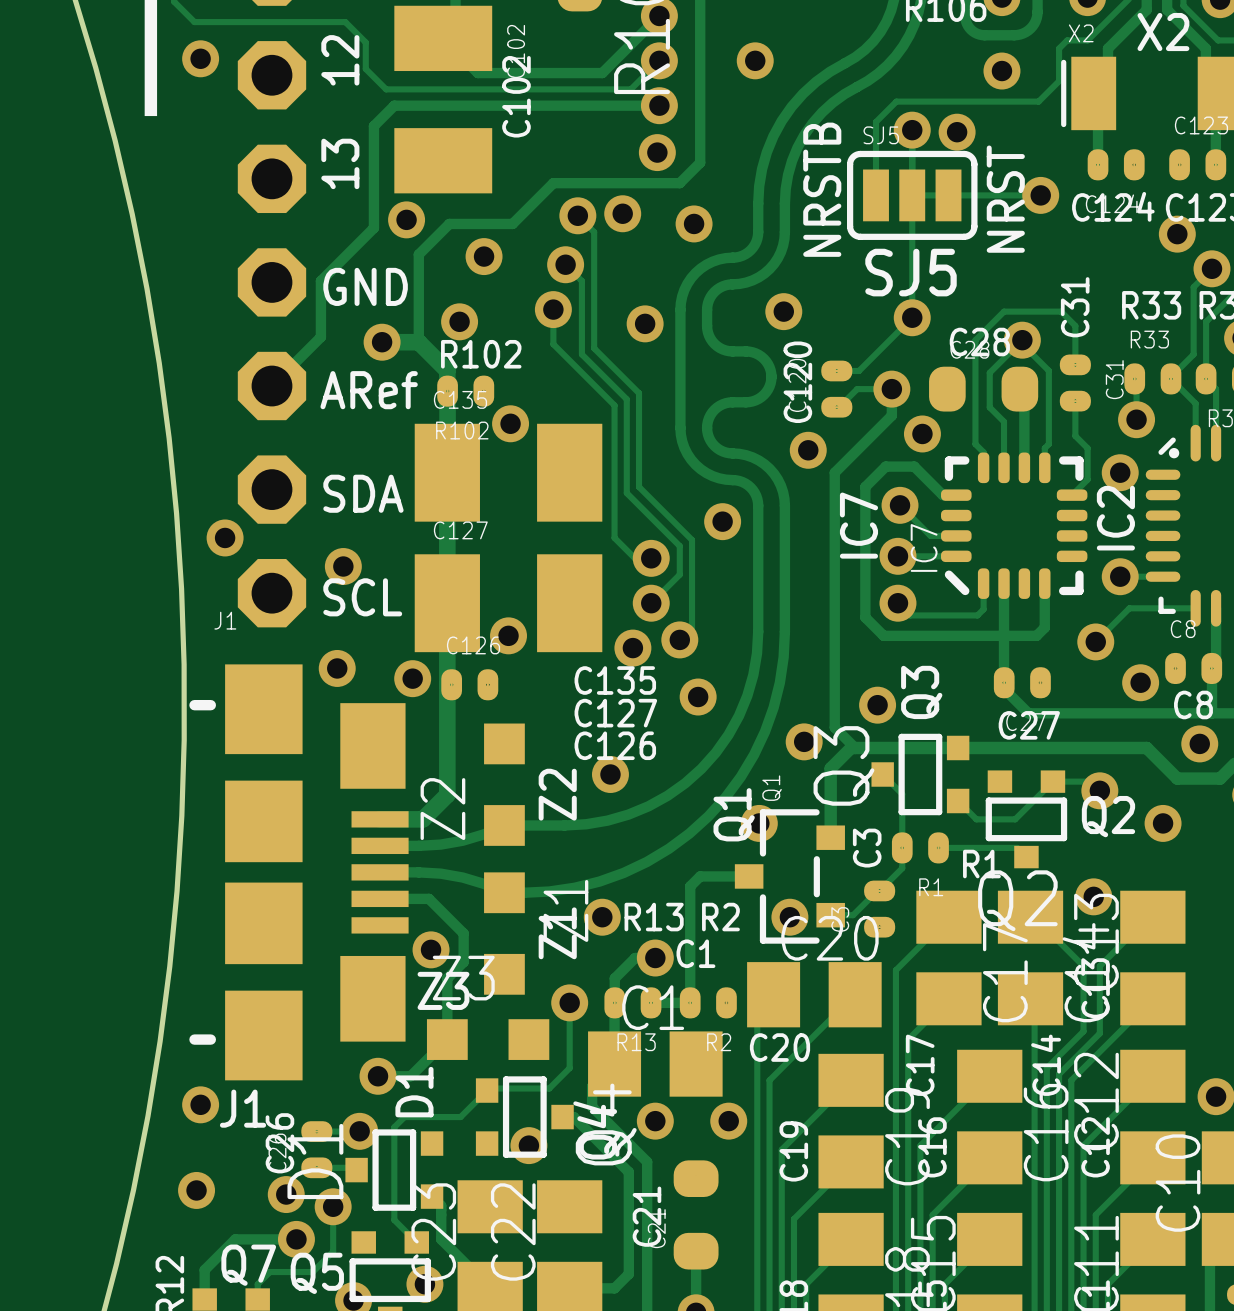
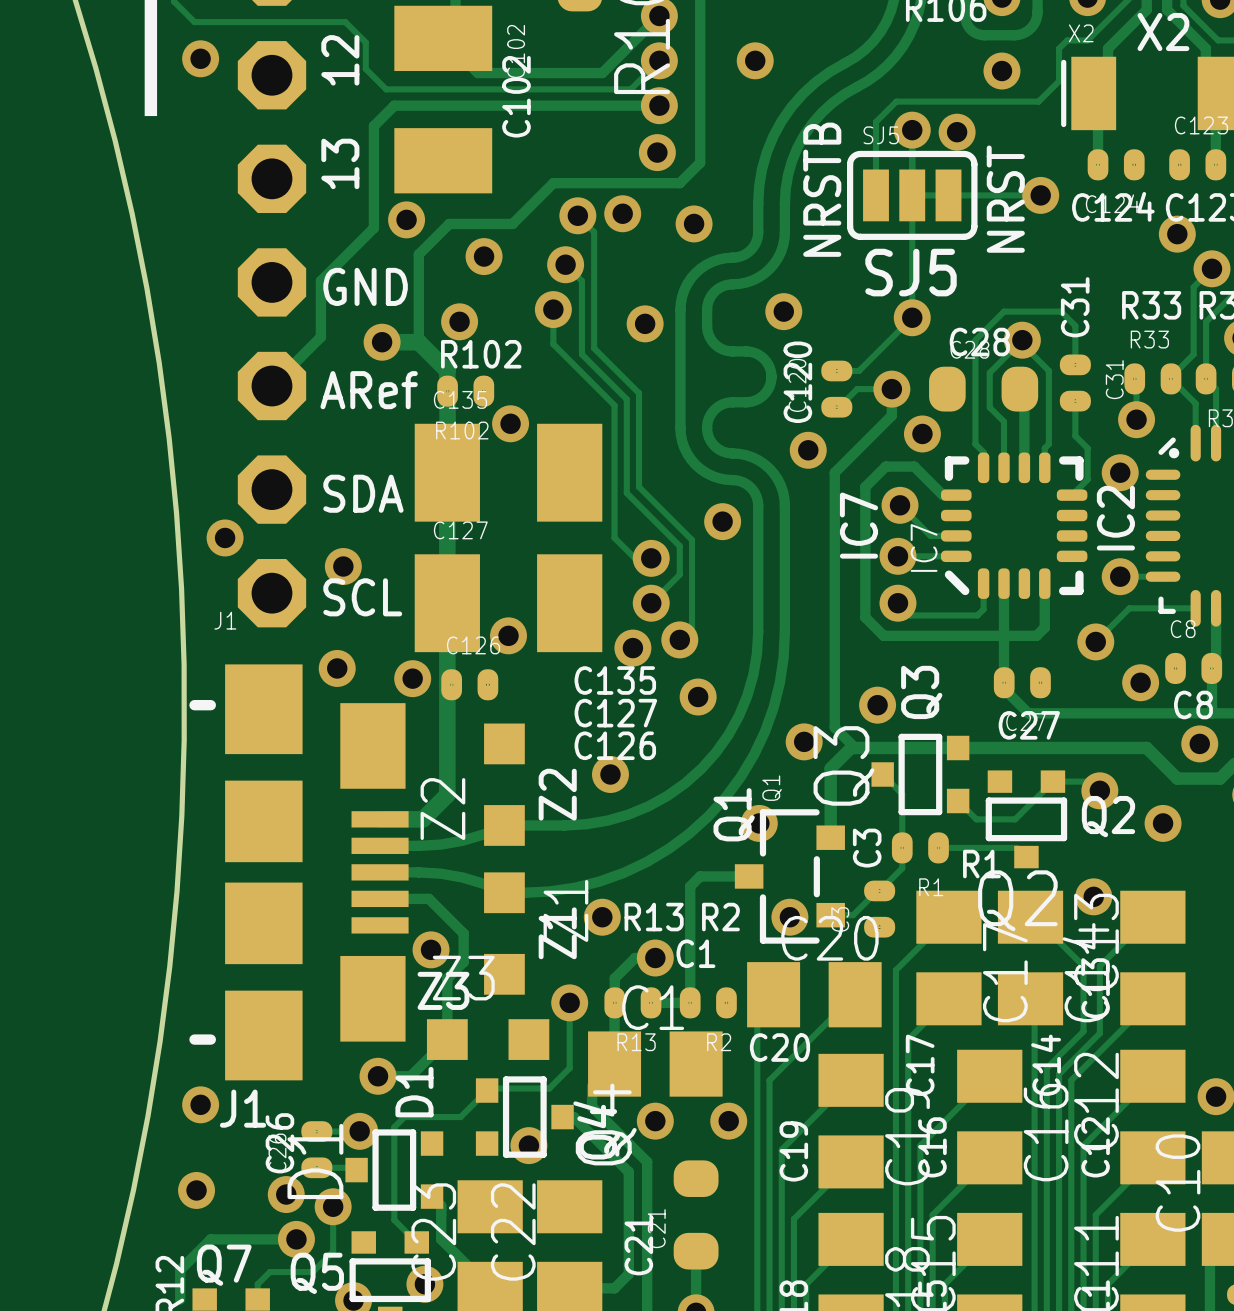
text position: C21 (646, 1216) -> C21 (638, 1245)
track: (235, 1239) (204, 1269) (204, 1299) -> (235, 1239) (210, 1239) (180, 1269) (180, 1299)
text position: Q7 (248, 1265) -> Q7 (224, 1265)

